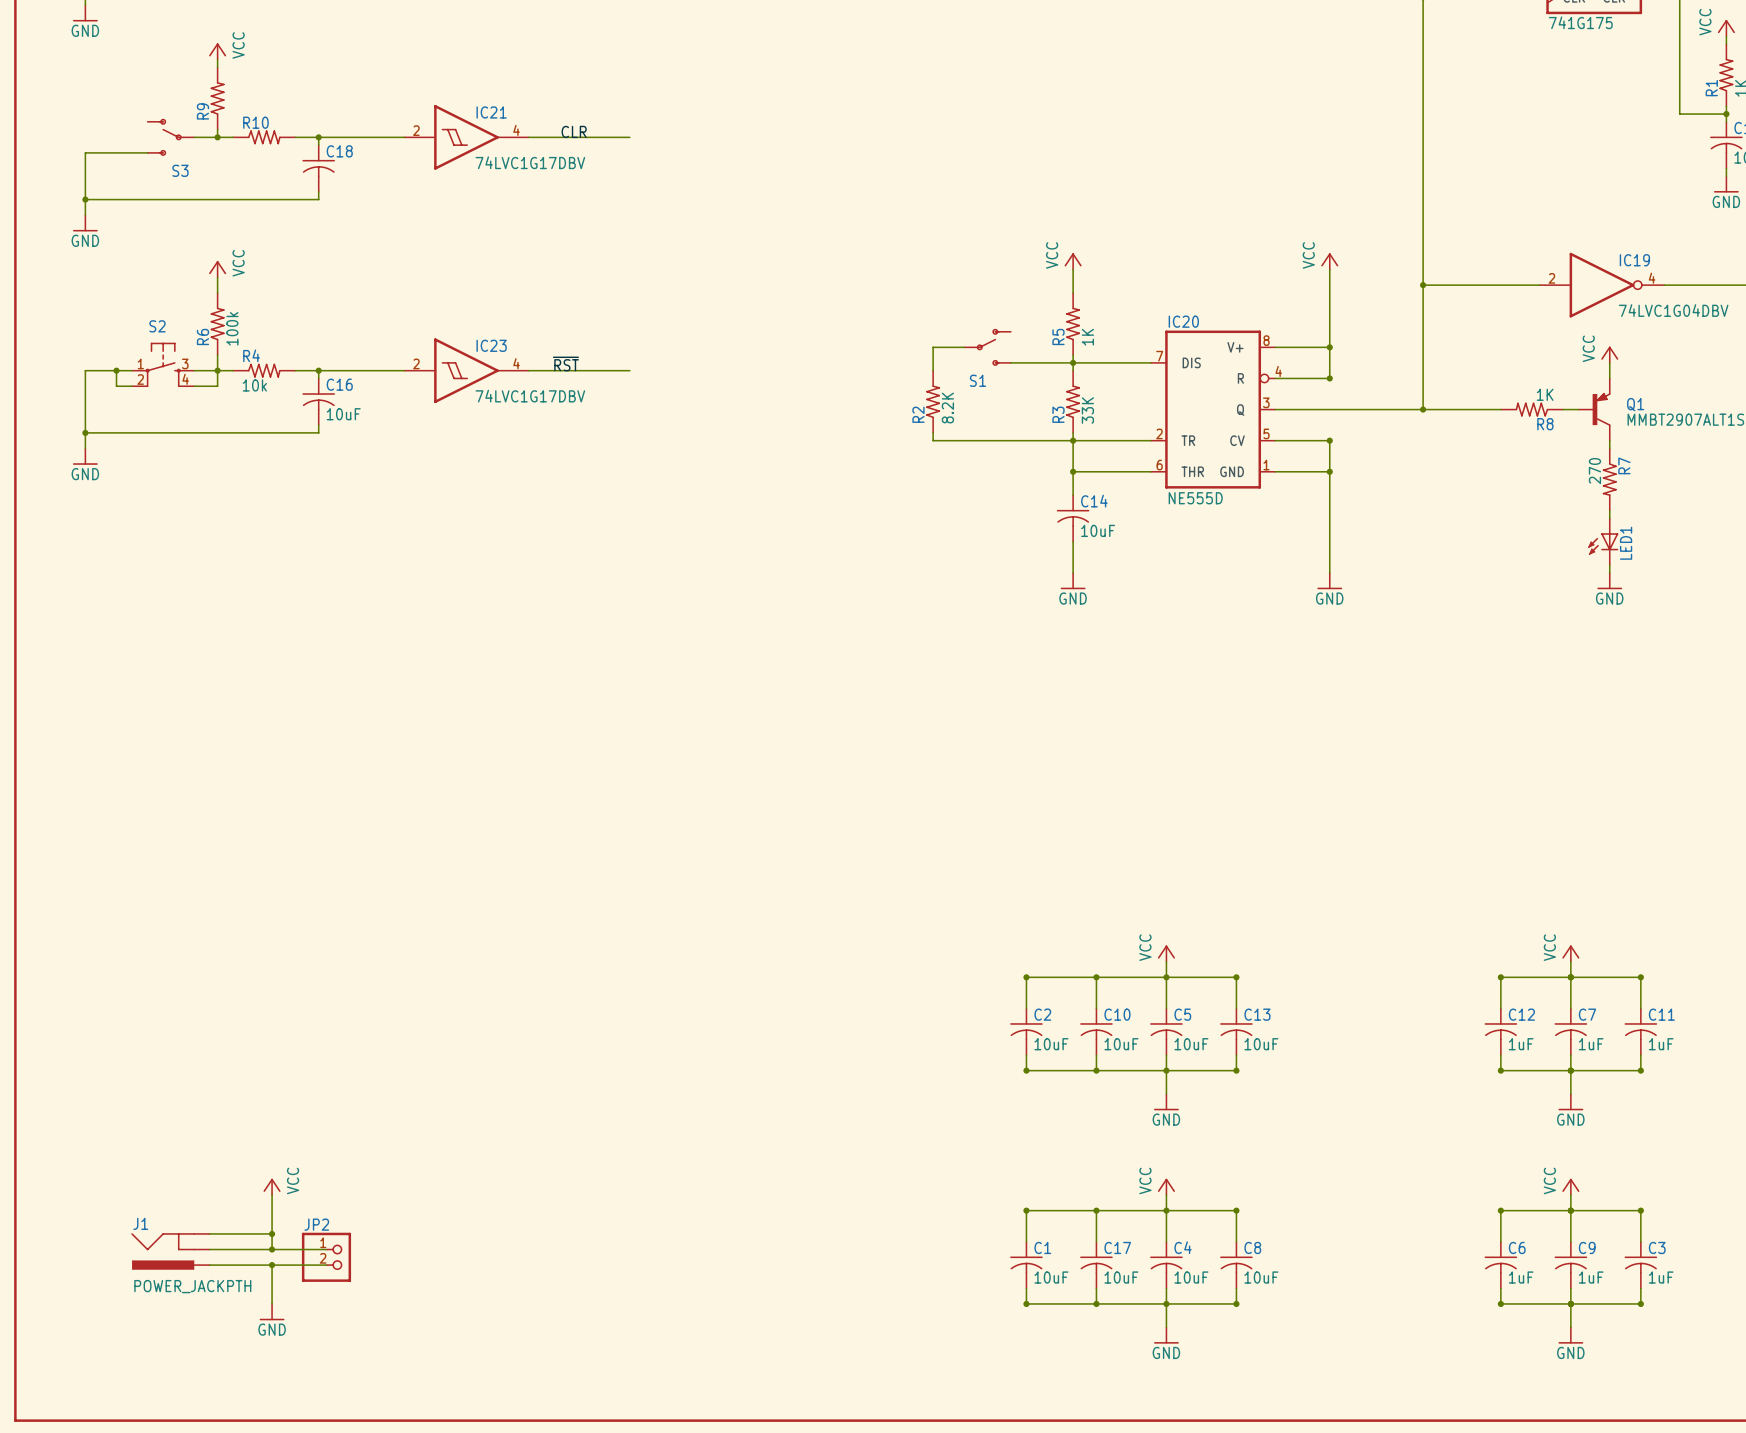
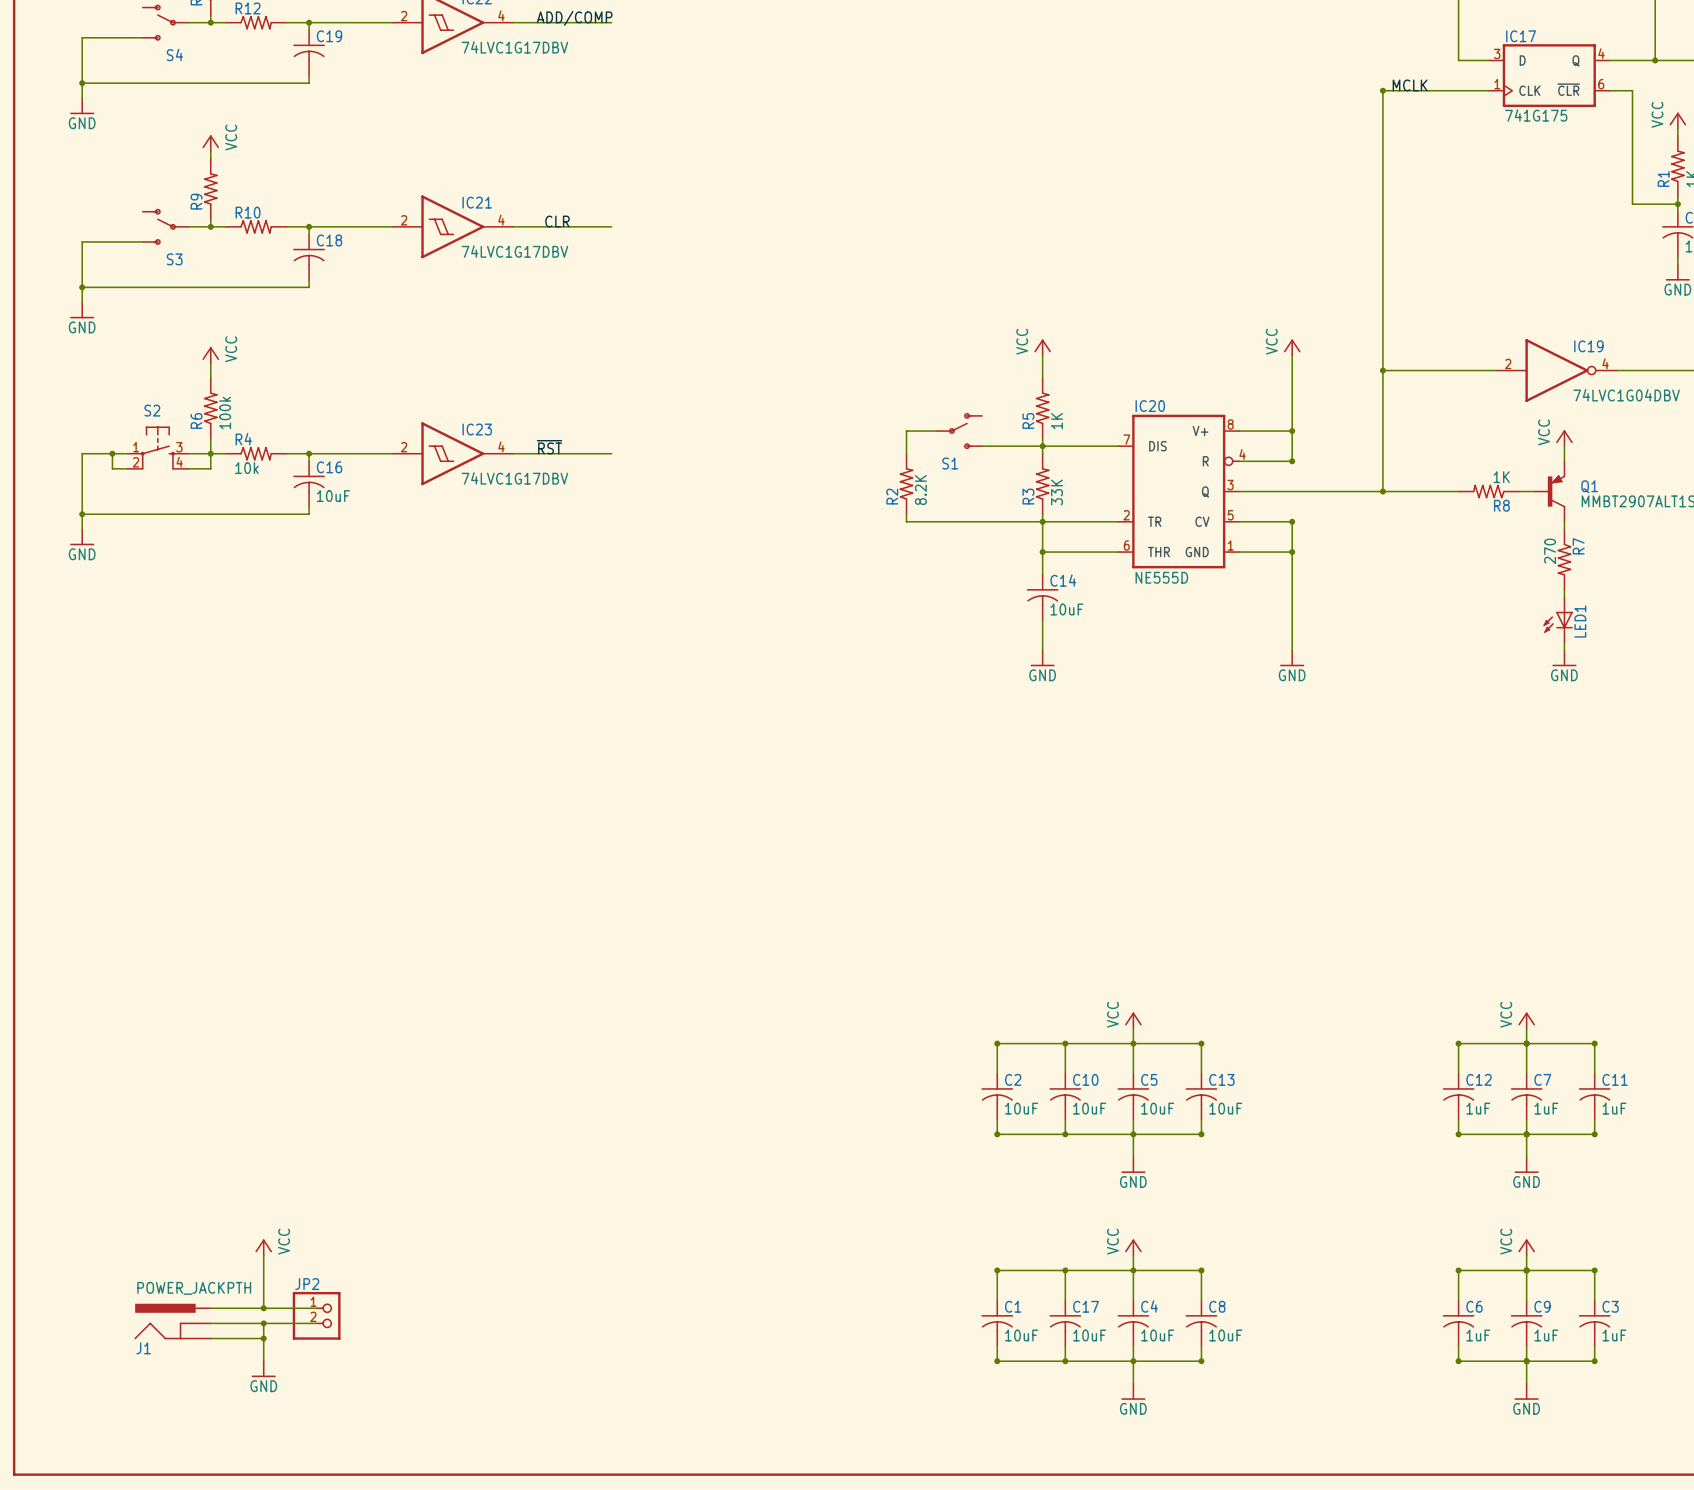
wire: (209, 1233) (272, 1233) -> none
junction: (272, 1233) -> none
J1 flip: as is (163, 1251) -> up-down (165, 1321)
wire: none -> (210, 1338) (263, 1338)
junction: none -> (263, 1338)

